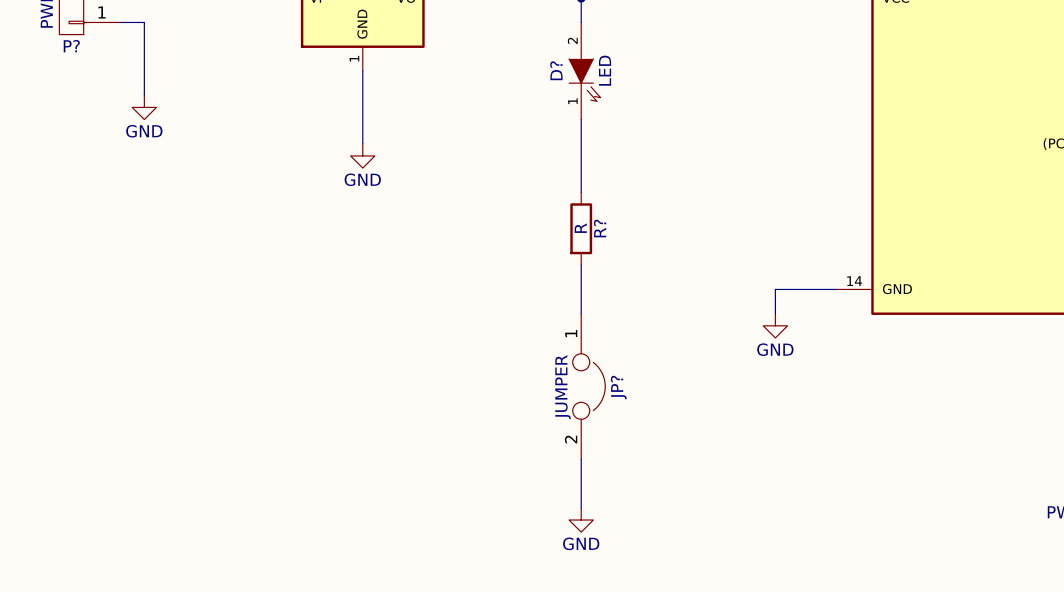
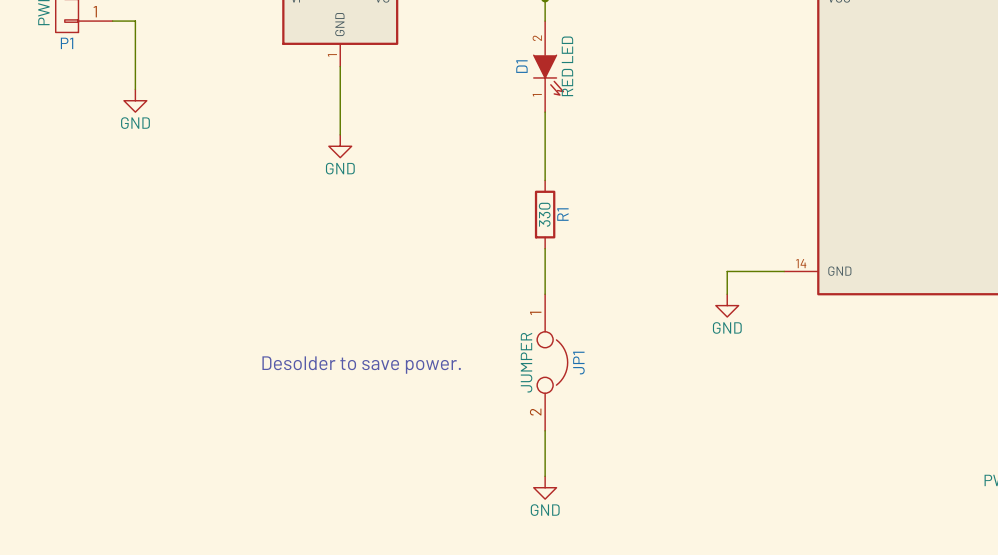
P? name: P? (71, 46) -> P1 (67, 43)
D? name: D? (556, 70) -> D1 (521, 66)
D? value: LED (605, 70) -> RED LED (567, 66)
R? value: R (580, 228) -> 330 (544, 214)
R? name: R? (600, 228) -> R1 (562, 214)
JP? name: JP? (618, 387) -> JP1 (578, 363)
text: none -> Desolder to save power. (361, 365)

